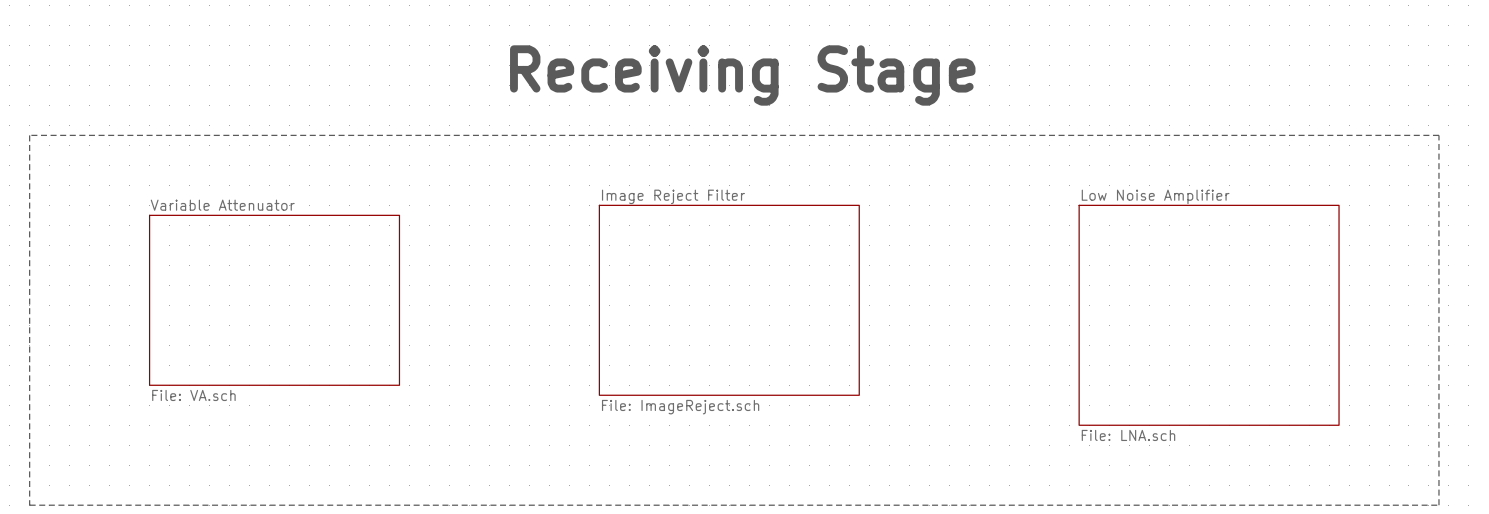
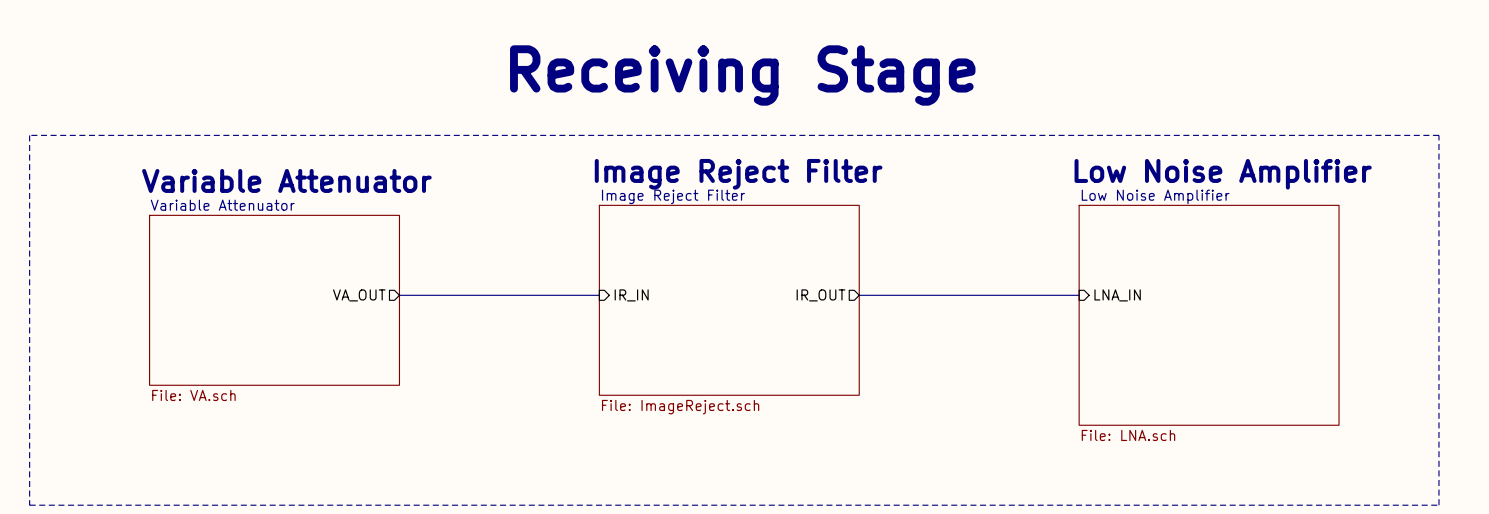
text: none -> Image Reject Filter (738, 174)
text: none -> Low Noise Amplifier (1223, 174)
text: none -> Variable Attenuator (286, 180)
sheet pin: none -> VA_OUT (359, 295)
wire: none -> (399, 295) (599, 295)
sheet pin: none -> IR_IN (631, 295)
sheet pin: none -> IR_OUT (821, 295)
wire: none -> (859, 295) (1079, 295)
sheet pin: none -> LNA_IN (1117, 295)

